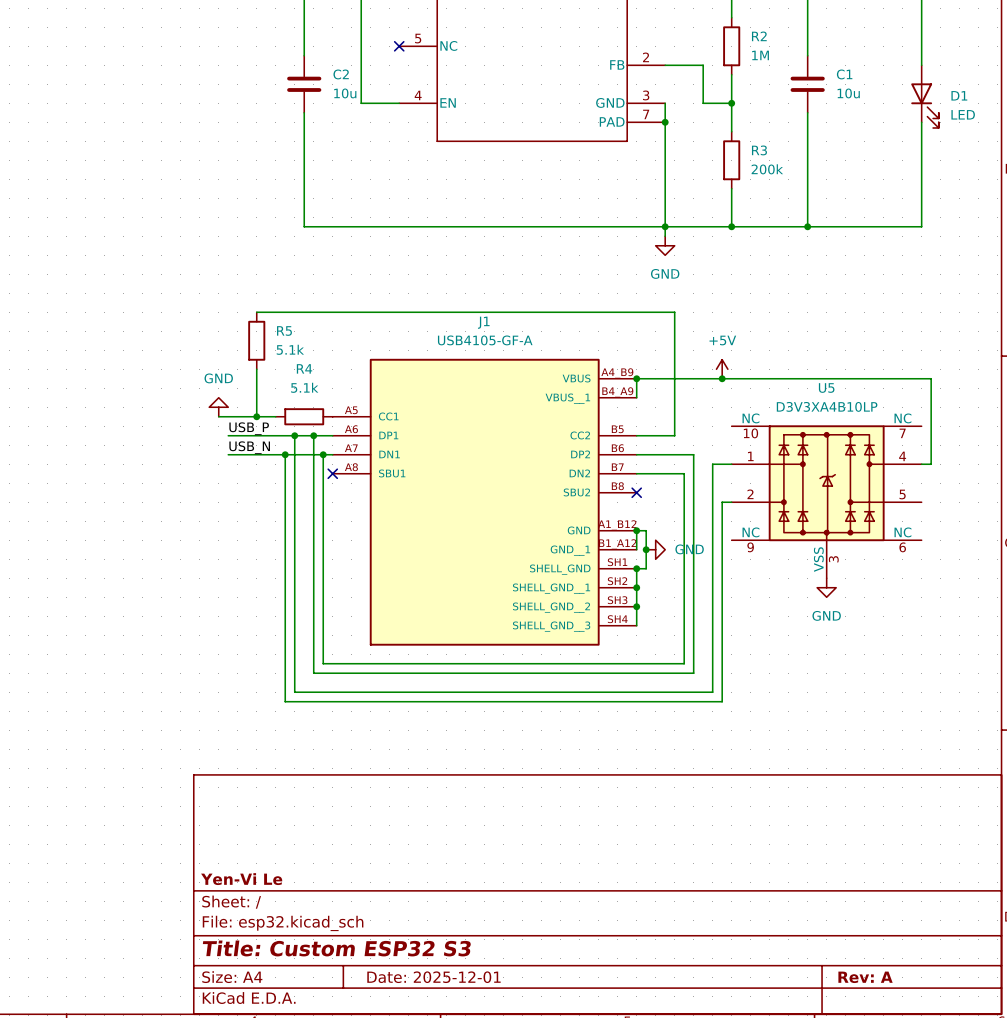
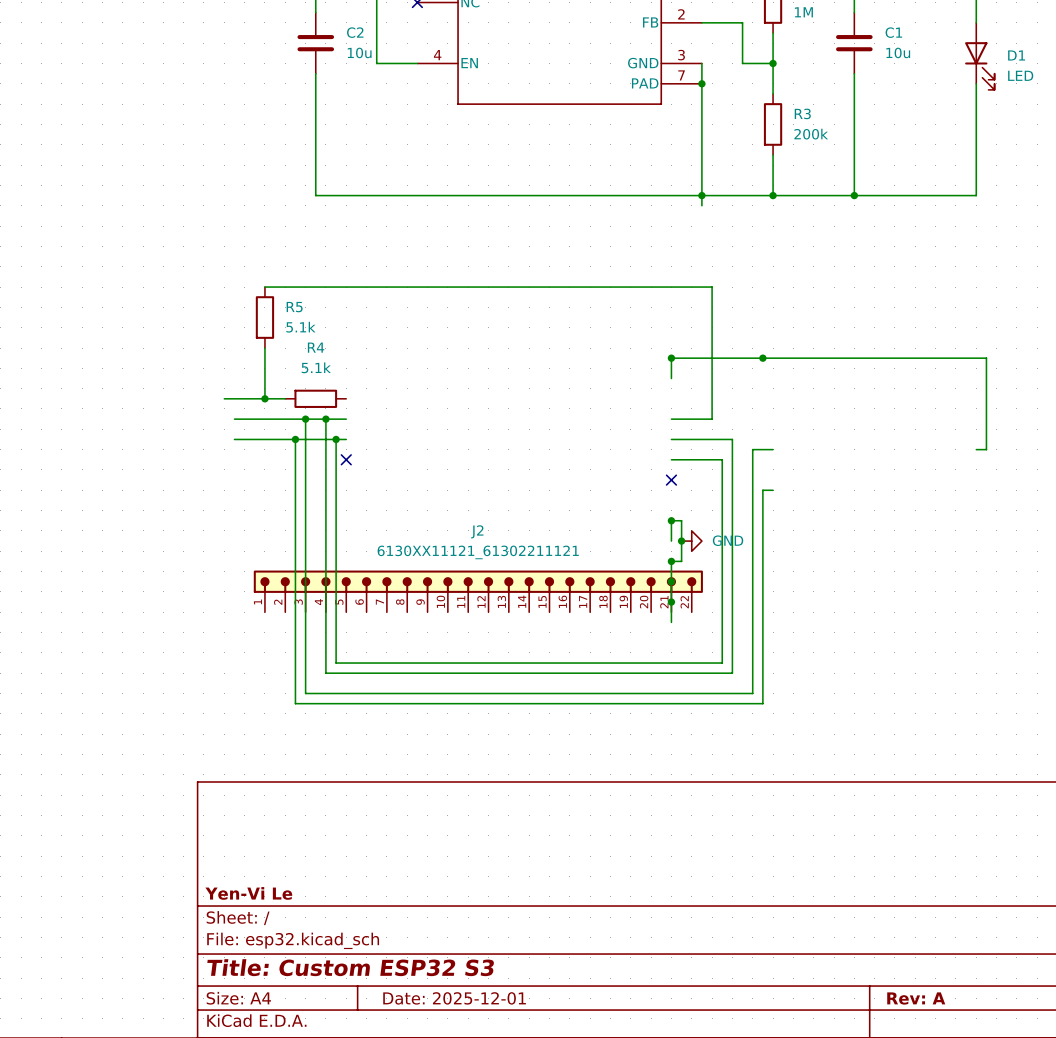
power symbol: GND (665, 245) -> none
power symbol: +5V (722, 369) -> none
power symbol: GND (218, 407) -> none
label: USB_P (249, 428) -> none
label: USB_N (249, 447) -> none
U5: D3V3XA4B10LP (826, 501) -> none
J1: USB4105-GF-A (484, 502) -> none
power symbol: GND (826, 587) -> none
J2: none -> 6130XX11121_61302211121 (478, 591)

